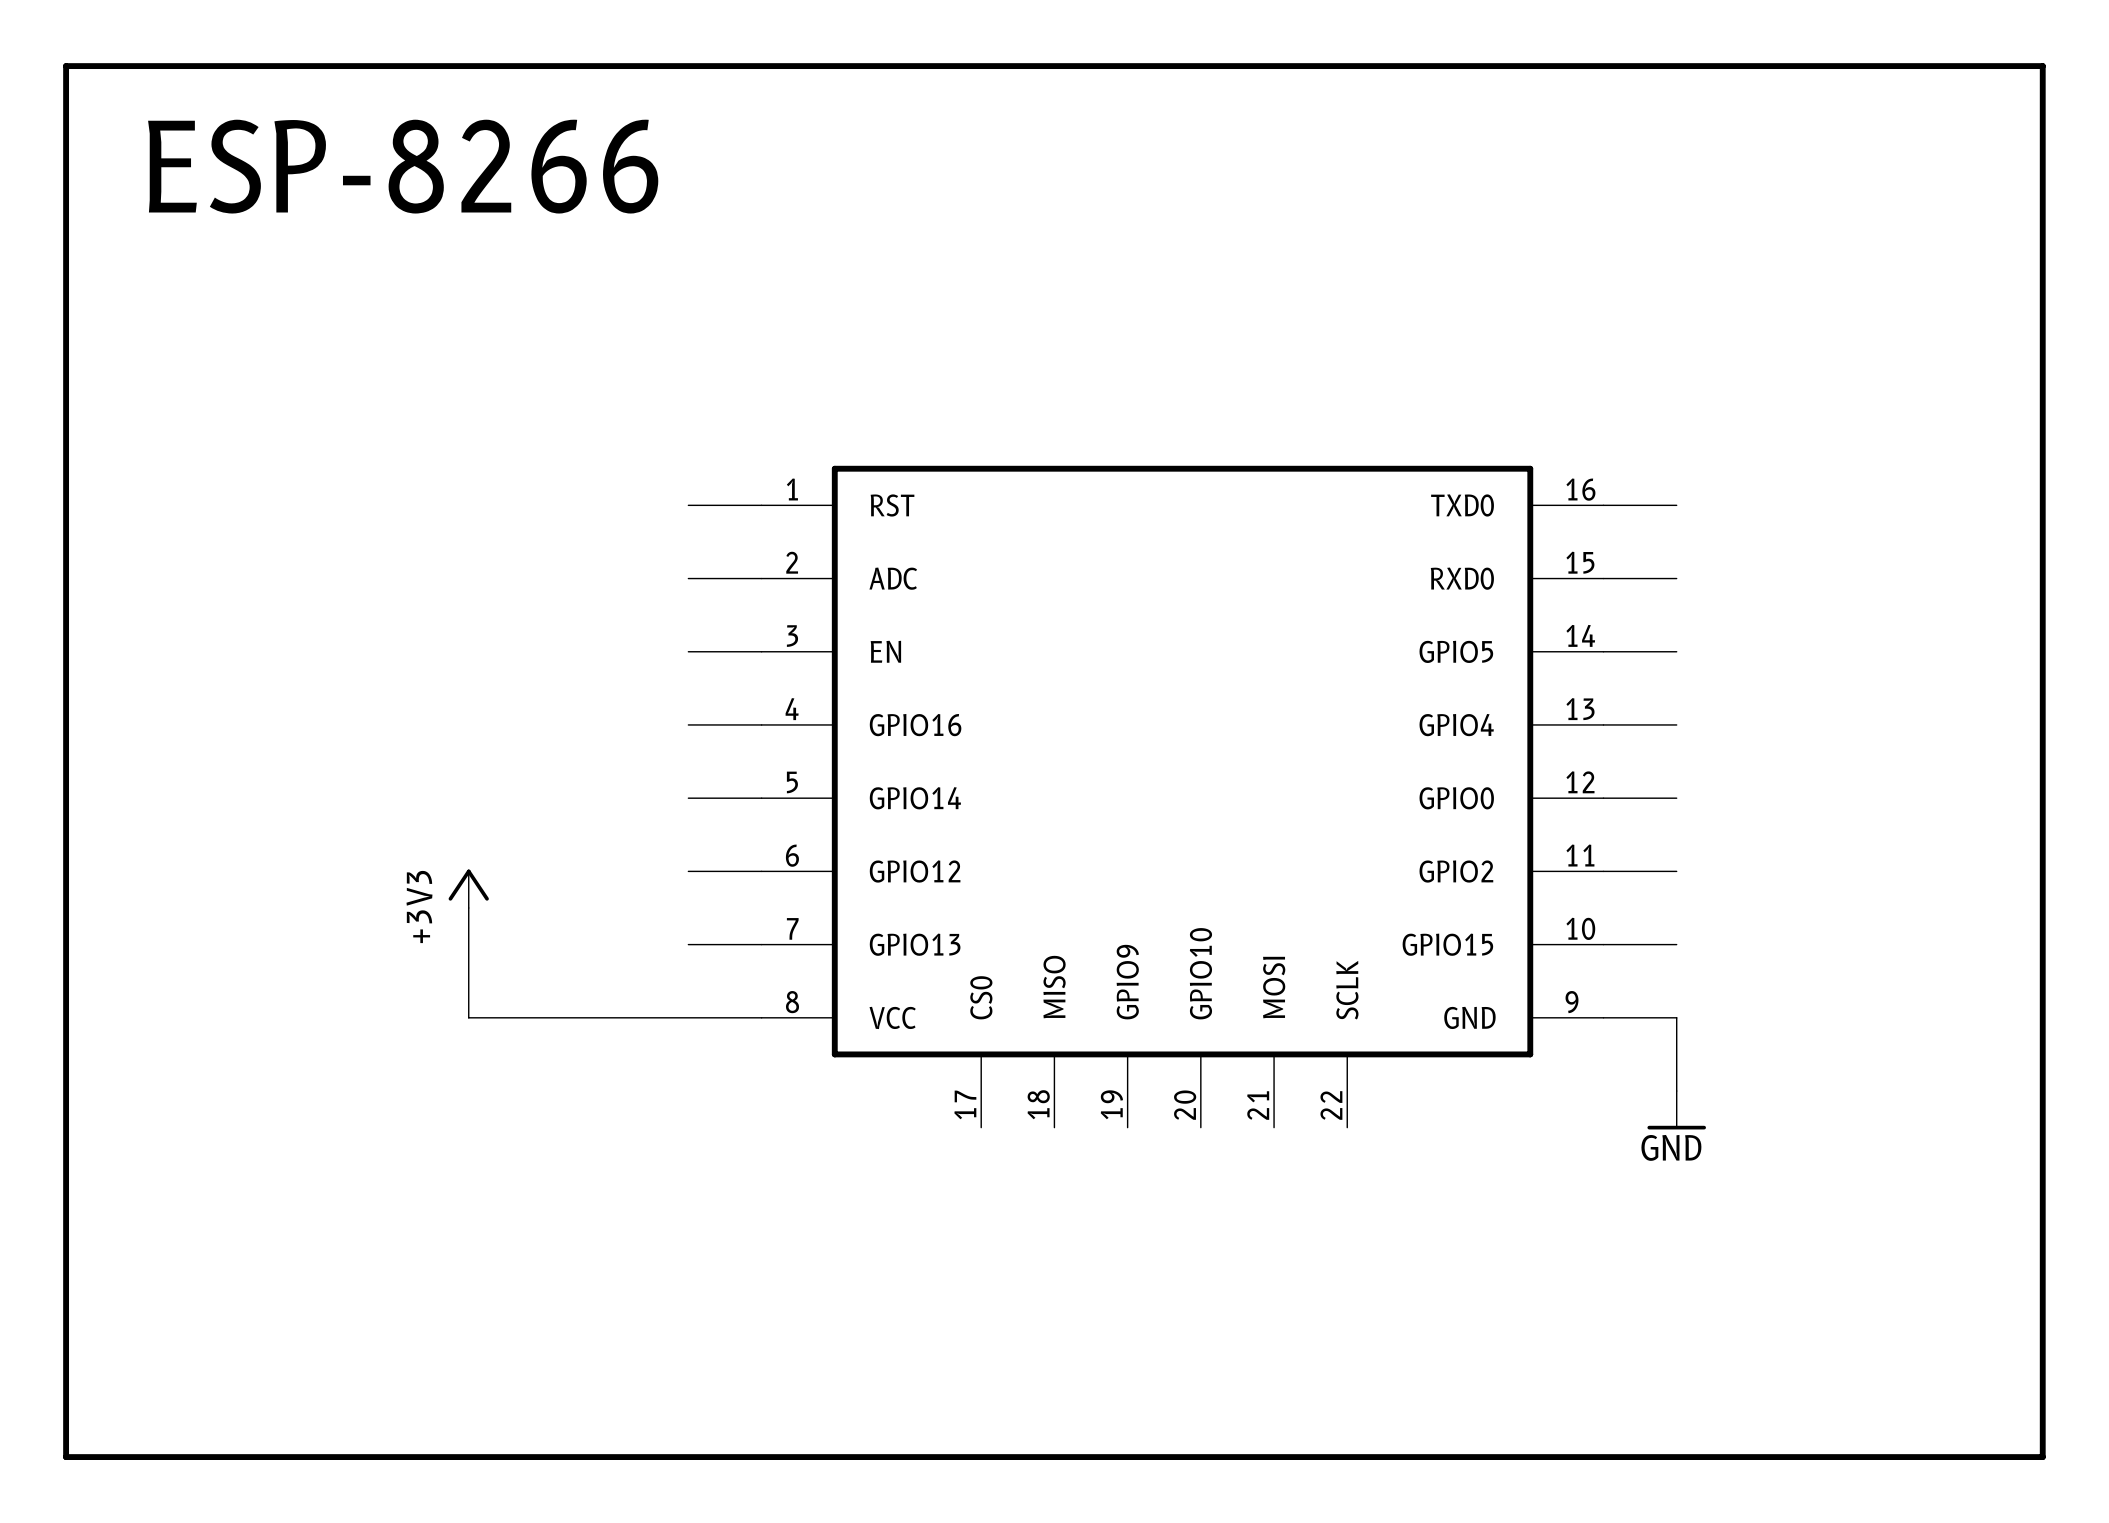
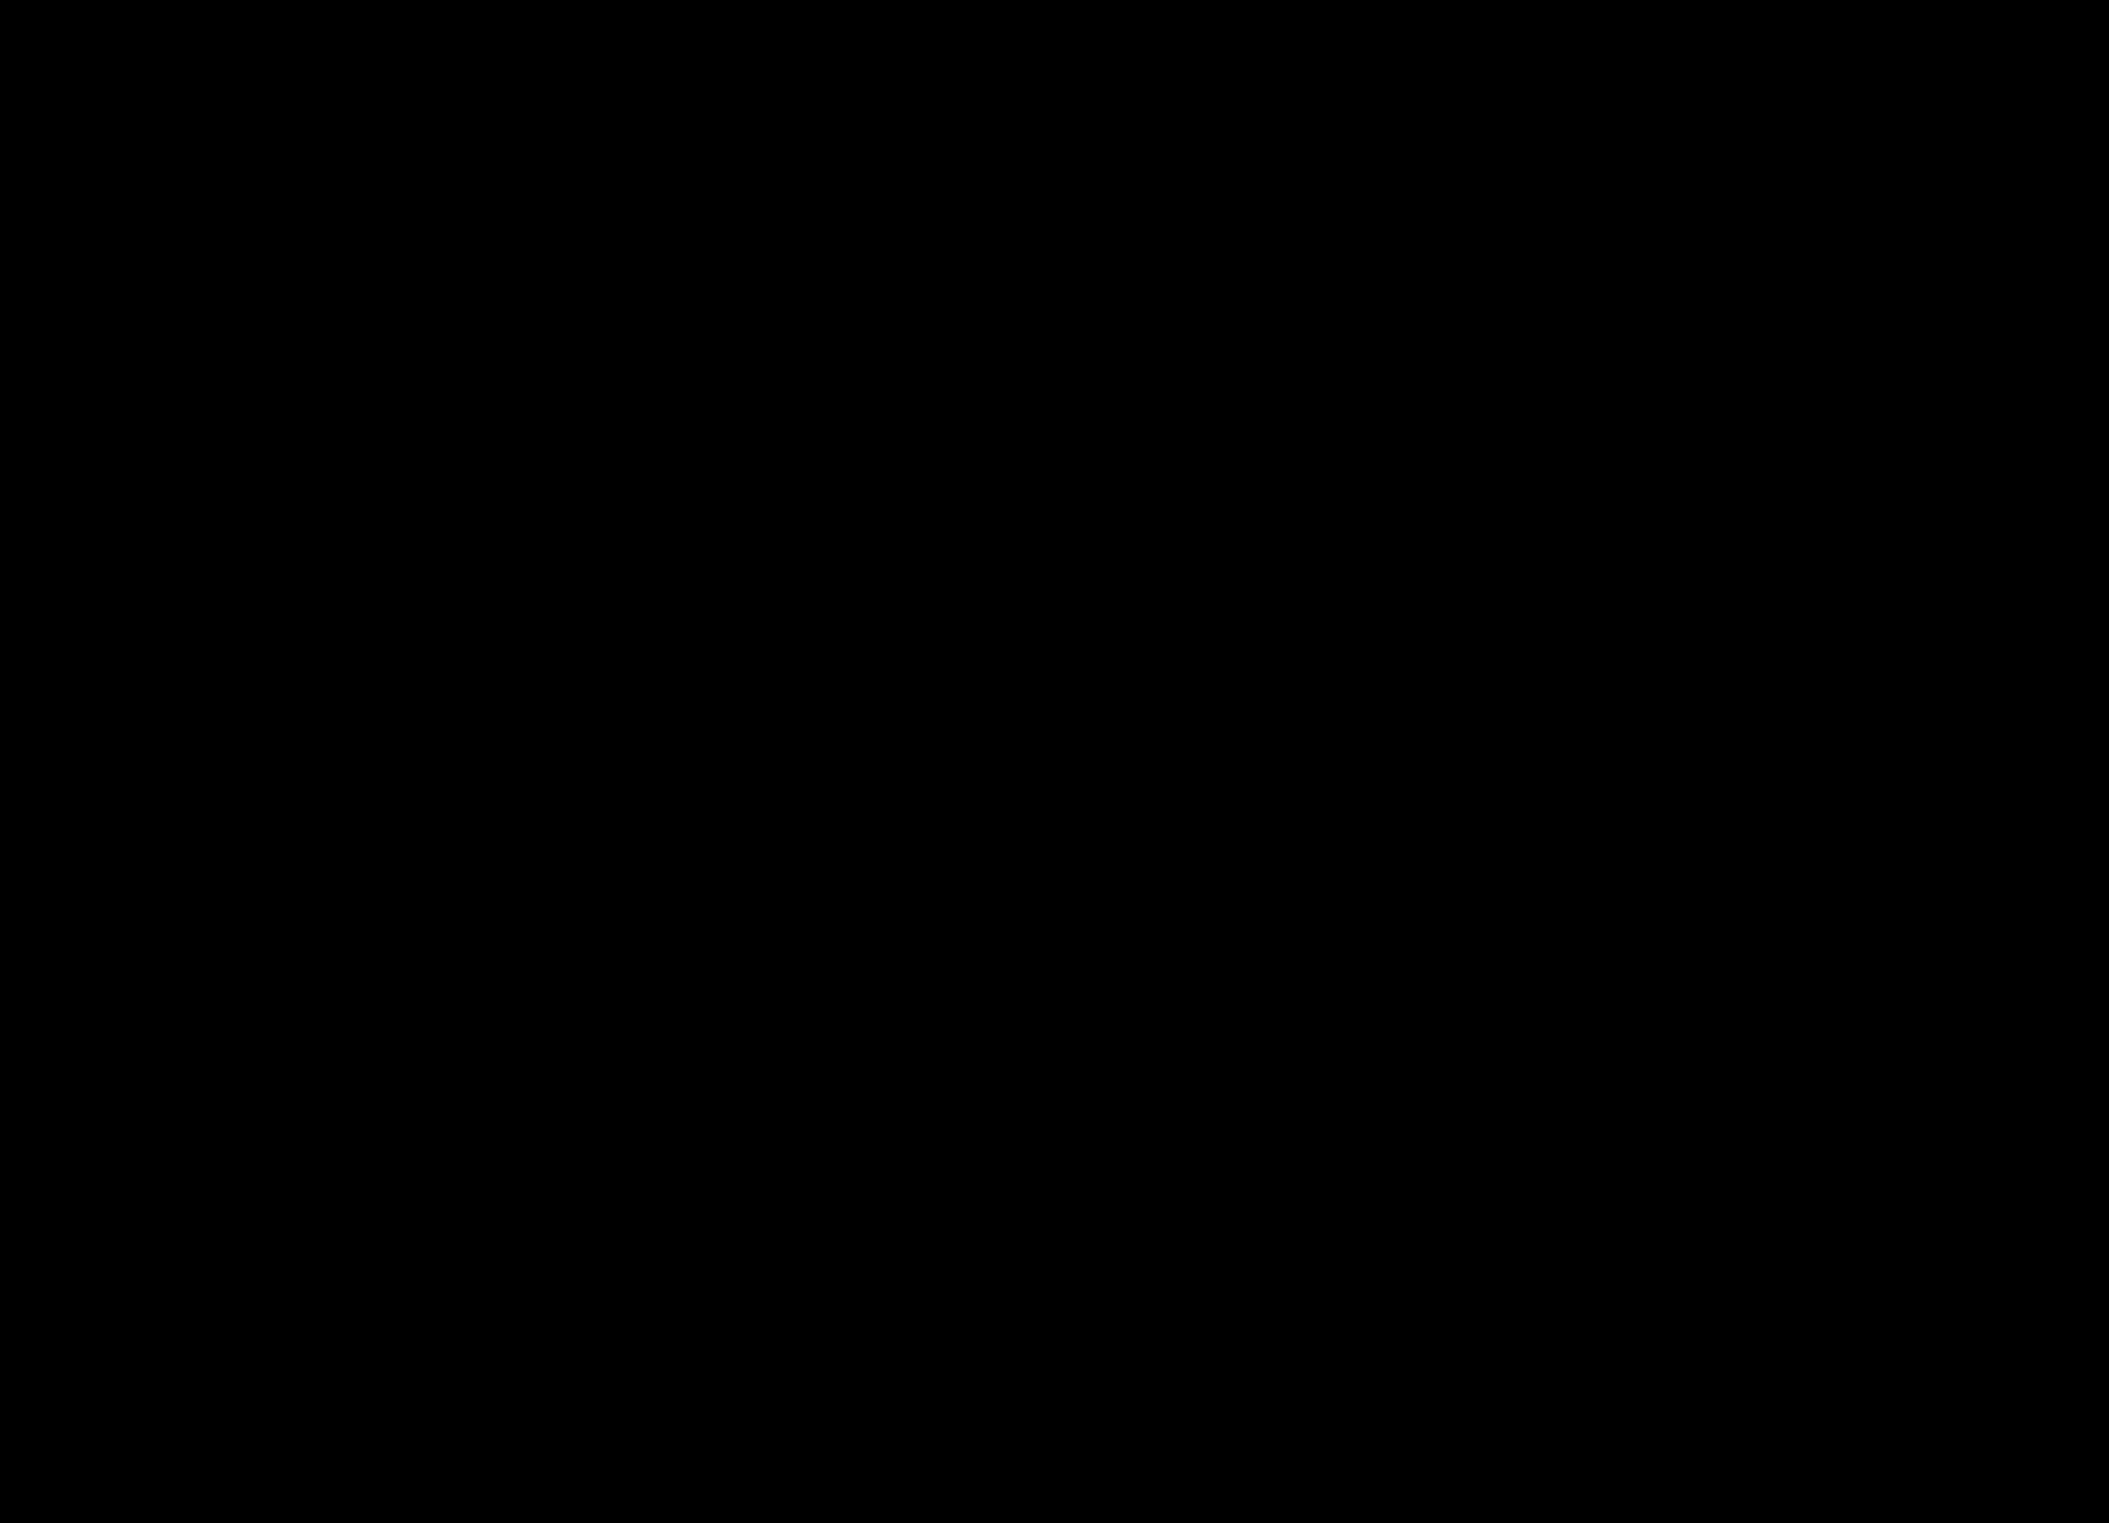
line: (66, 66) (66, 1457) (2042, 1457) (2042, 66) (66, 66) -> none
text: ESP-8266 (403, 166) -> none
wire: (688, 505) (761, 505) -> none
wire: (1603, 505) (1676, 505) -> none
wire: (688, 578) (761, 578) -> none
wire: (1603, 578) (1676, 578) -> none
wire: (688, 651) (761, 651) -> none
wire: (1603, 651) (1676, 651) -> none
wire: (688, 724) (761, 724) -> none
wire: (1603, 724) (1676, 724) -> none
part: (1182, 796) -> none
wire: (688, 798) (761, 798) -> none
wire: (1603, 798) (1676, 798) -> none
wire: (688, 871) (761, 871) -> none
wire: (1603, 871) (1676, 871) -> none
power symbol: +3V3 (468, 888) -> none
wire: (468, 907) (468, 1017) (761, 1017) -> none
wire: (688, 944) (761, 944) -> none
wire: (1603, 944) (1676, 944) -> none
wire: (1603, 1017) (1676, 1017) (1676, 1091) -> none
power symbol: GND (1676, 1110) -> none

